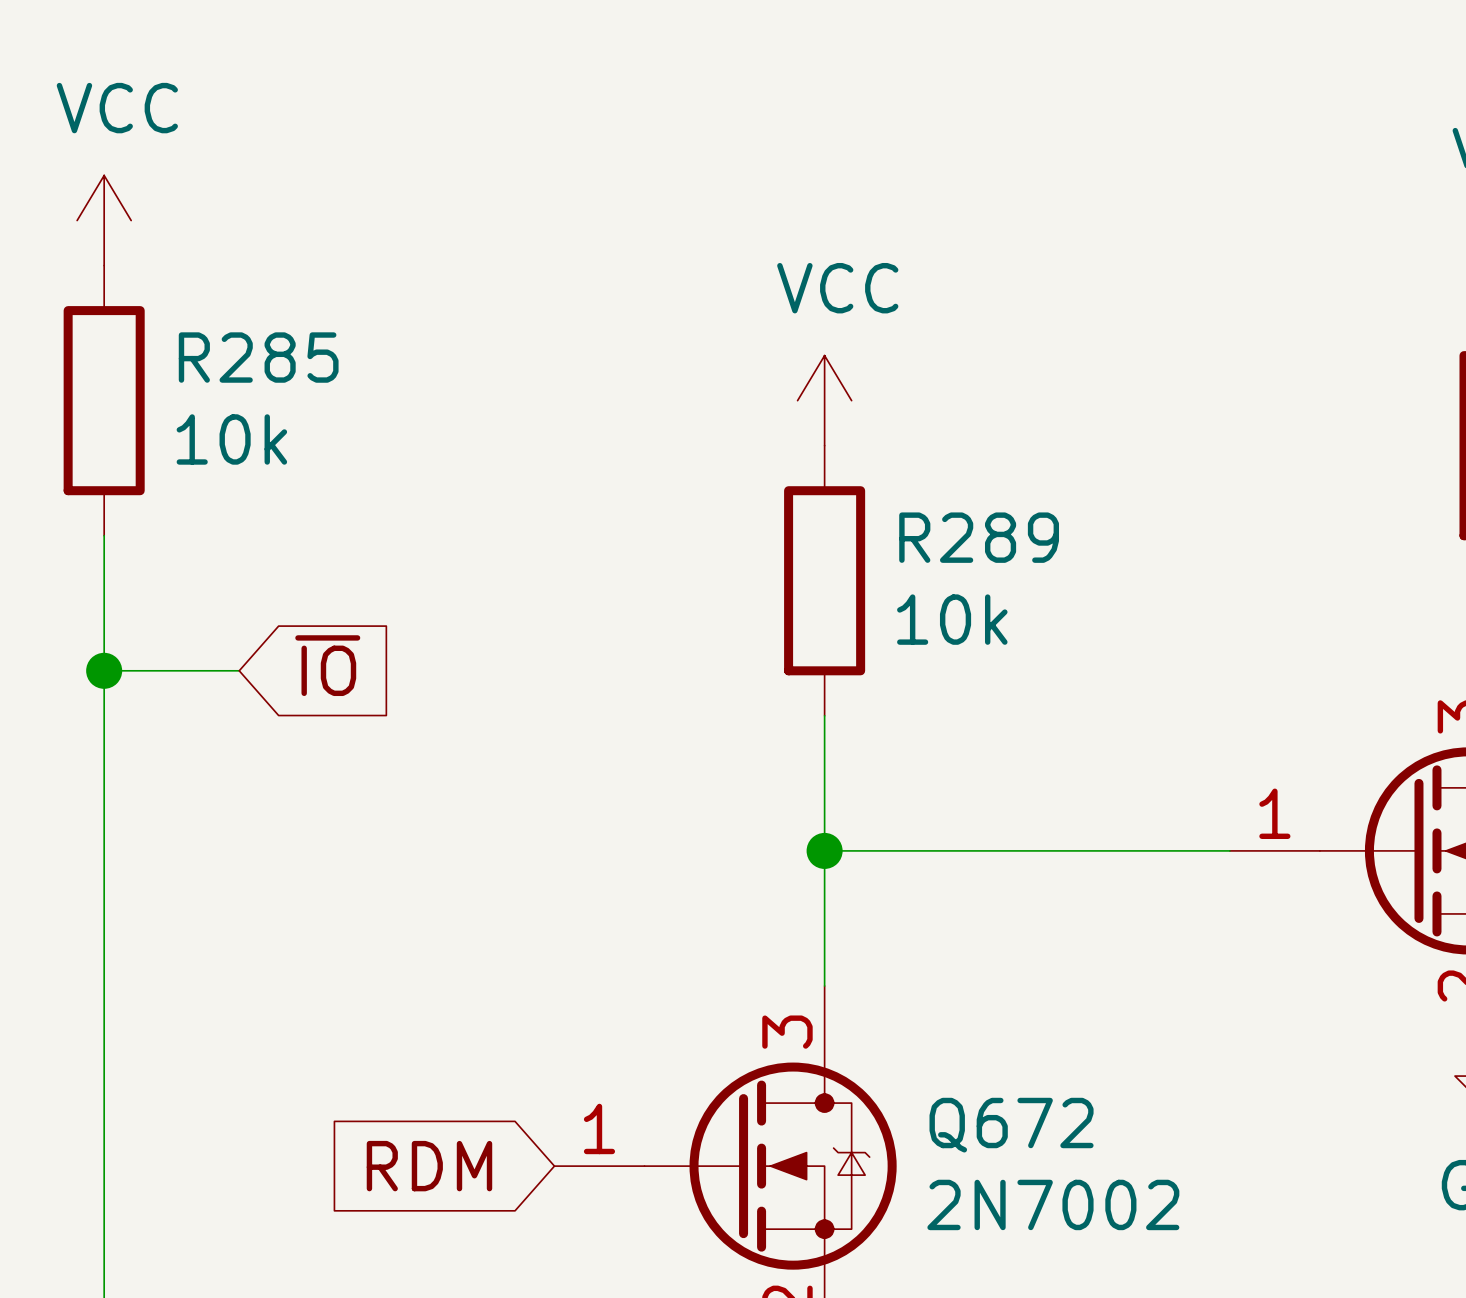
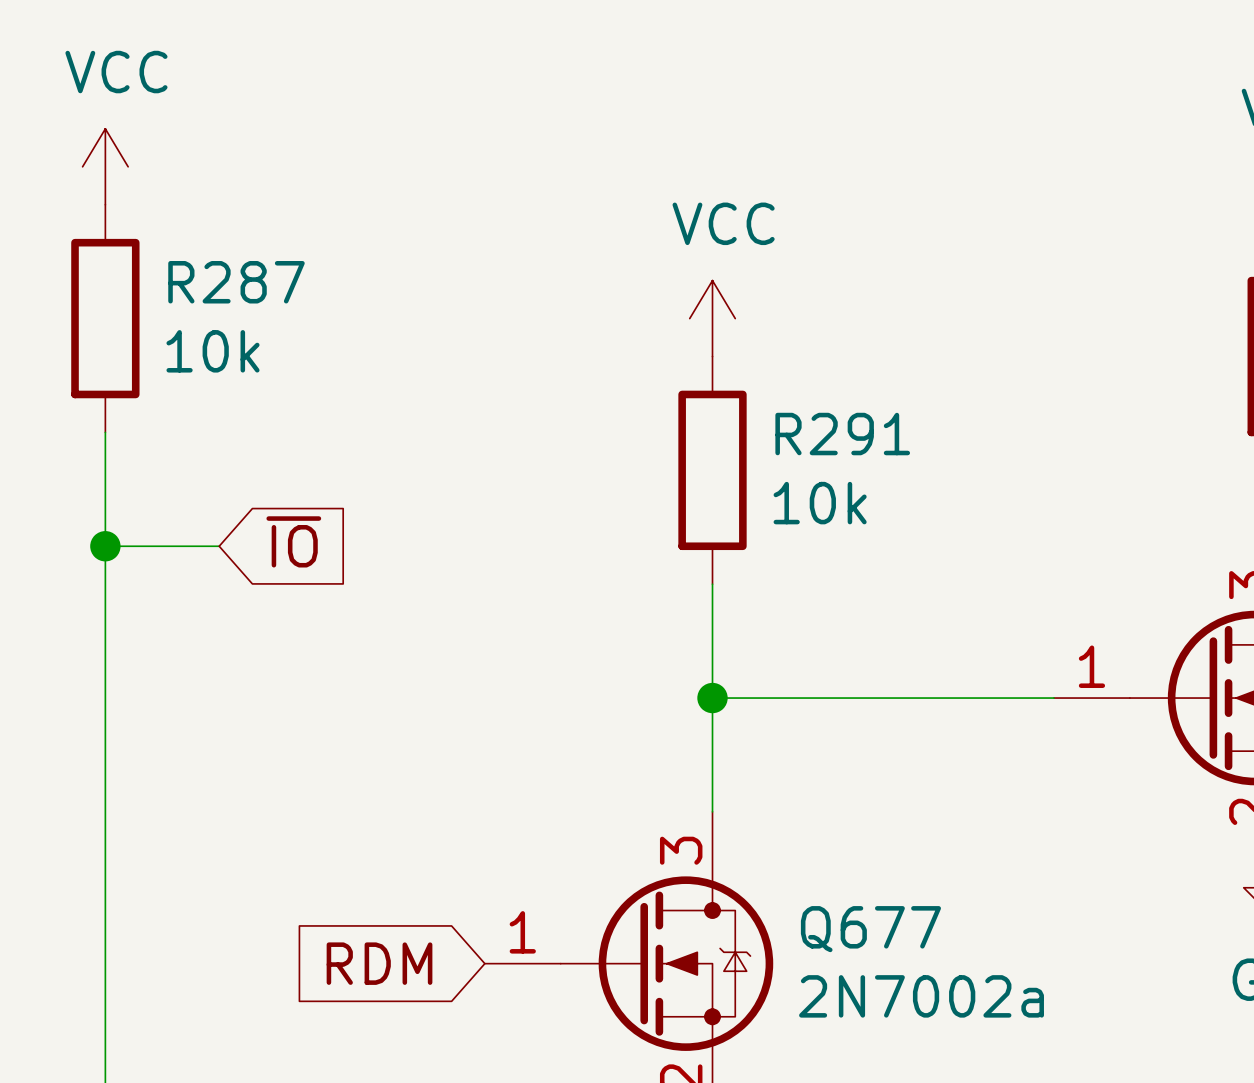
R285 name: R285 (258, 357) -> R287 (236, 282)
R289 name: R289 (979, 537) -> R291 (842, 434)
Q672 name: Q672 (1011, 1125) -> Q677 (870, 929)
Q672 value: 2N7002 (1053, 1204) -> 2N7002a (921, 996)

